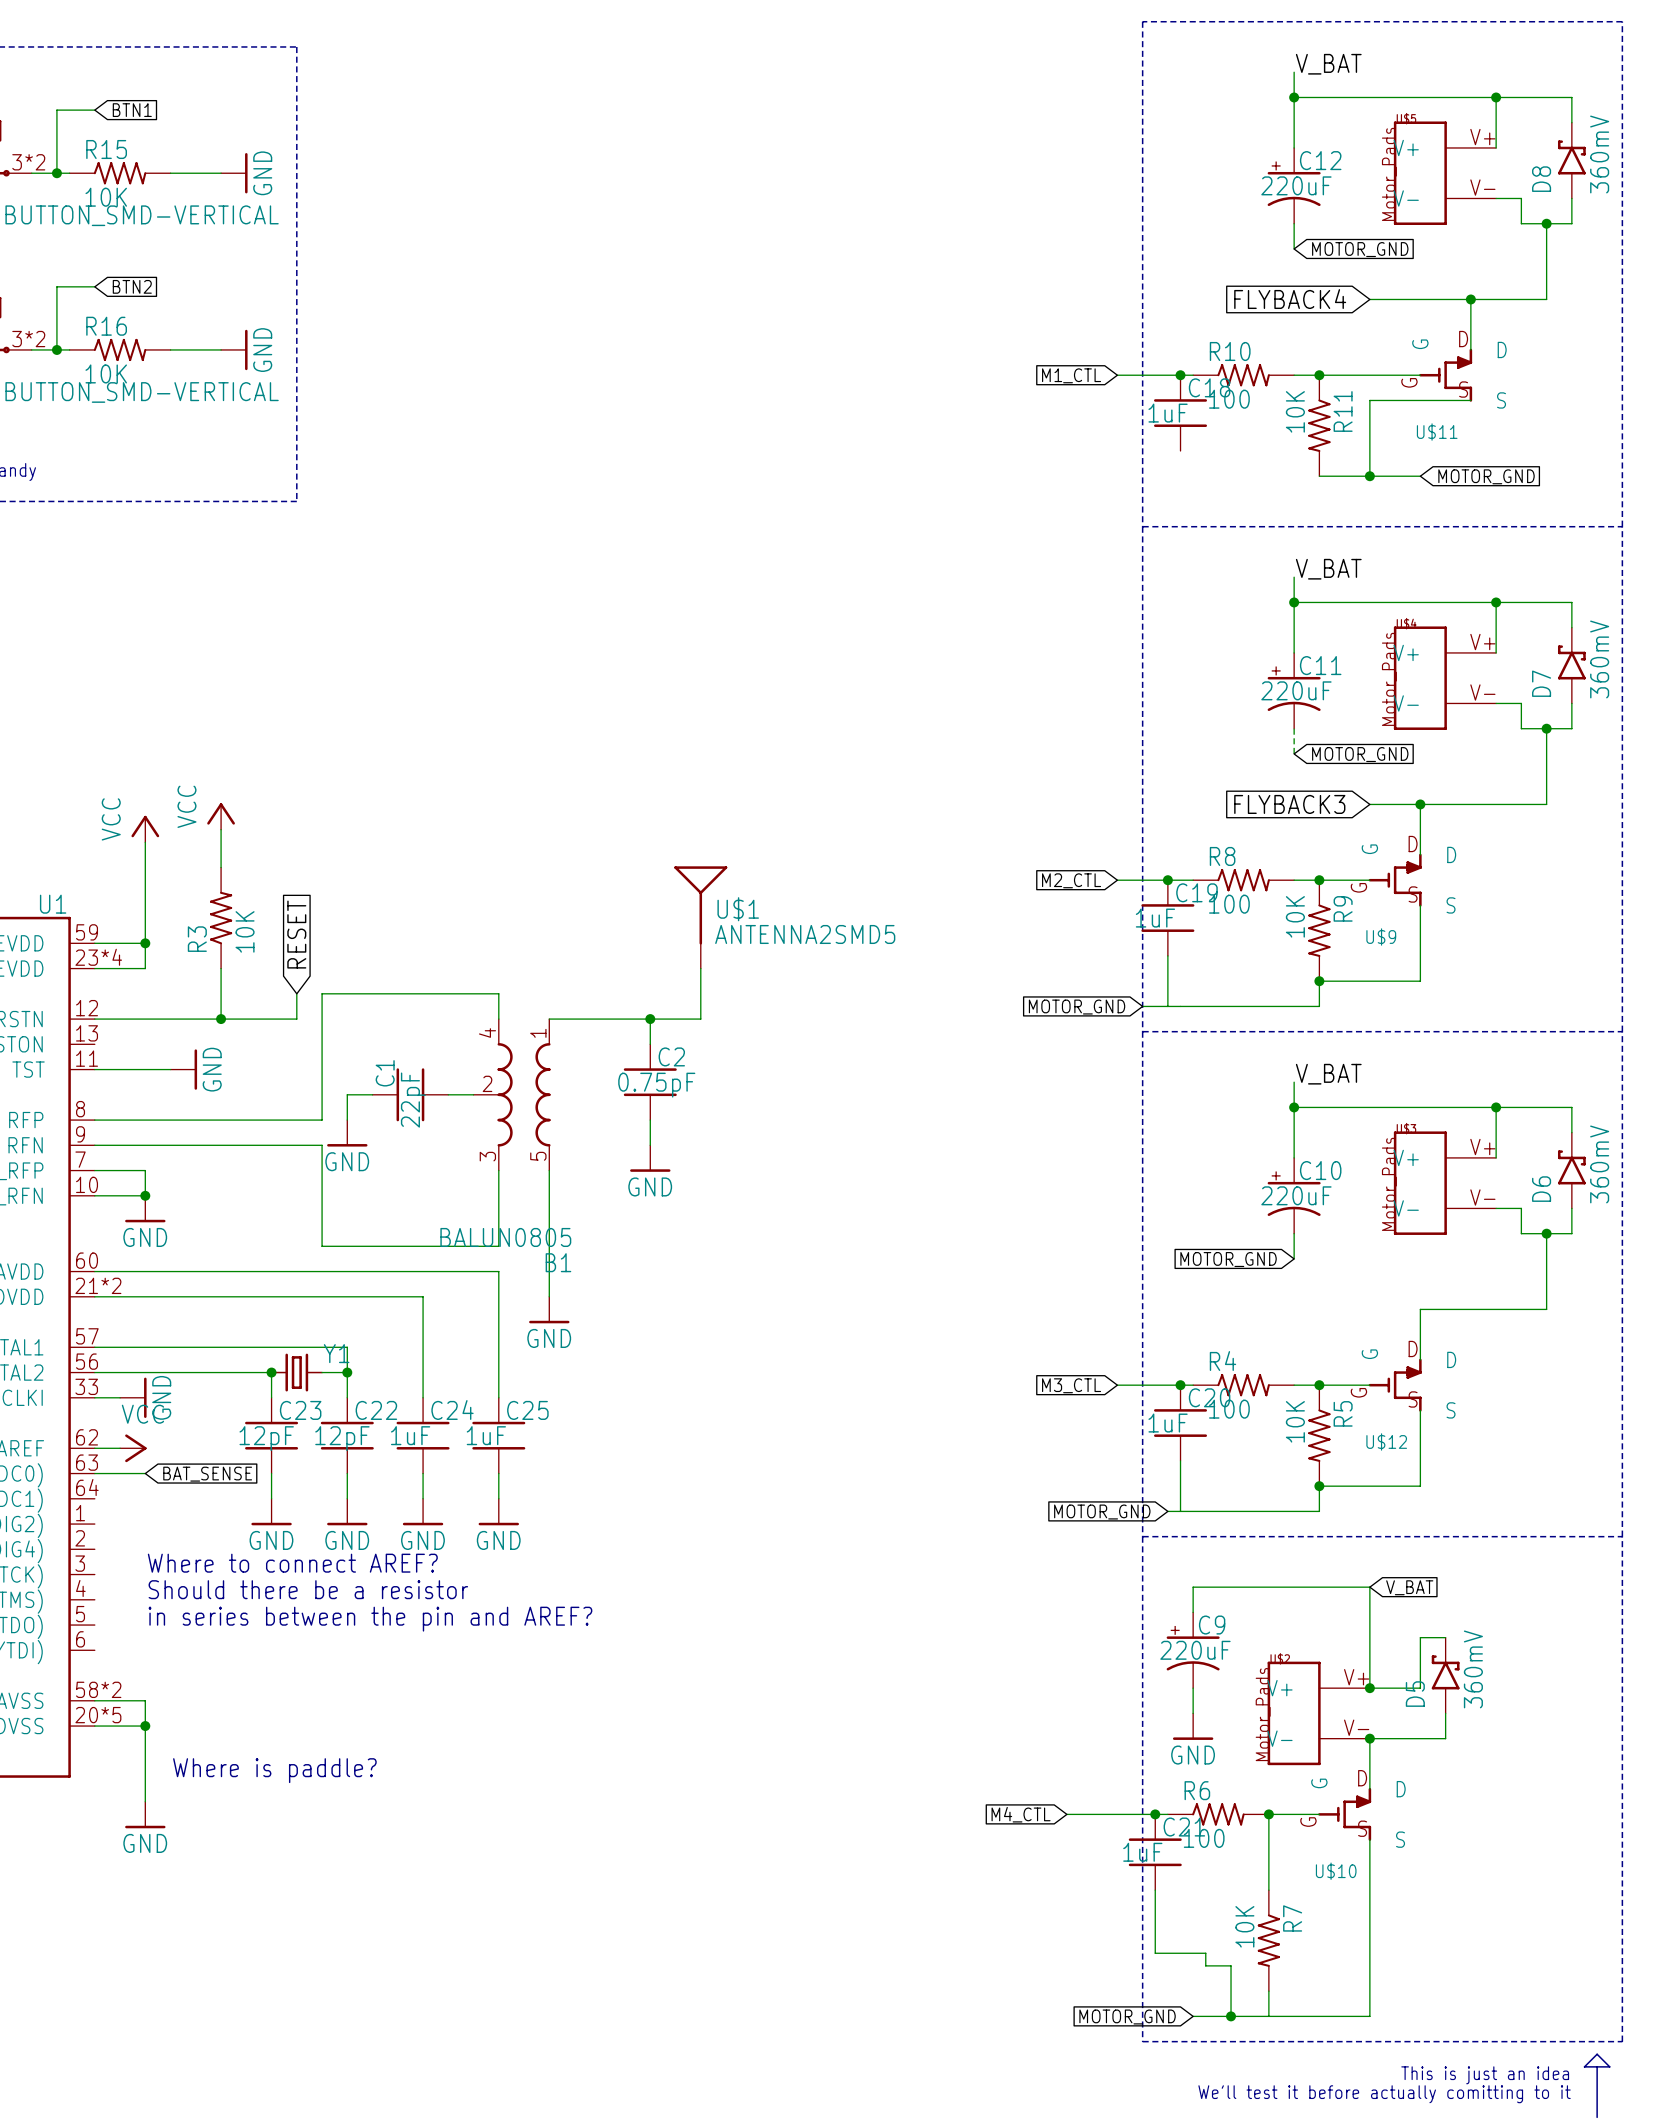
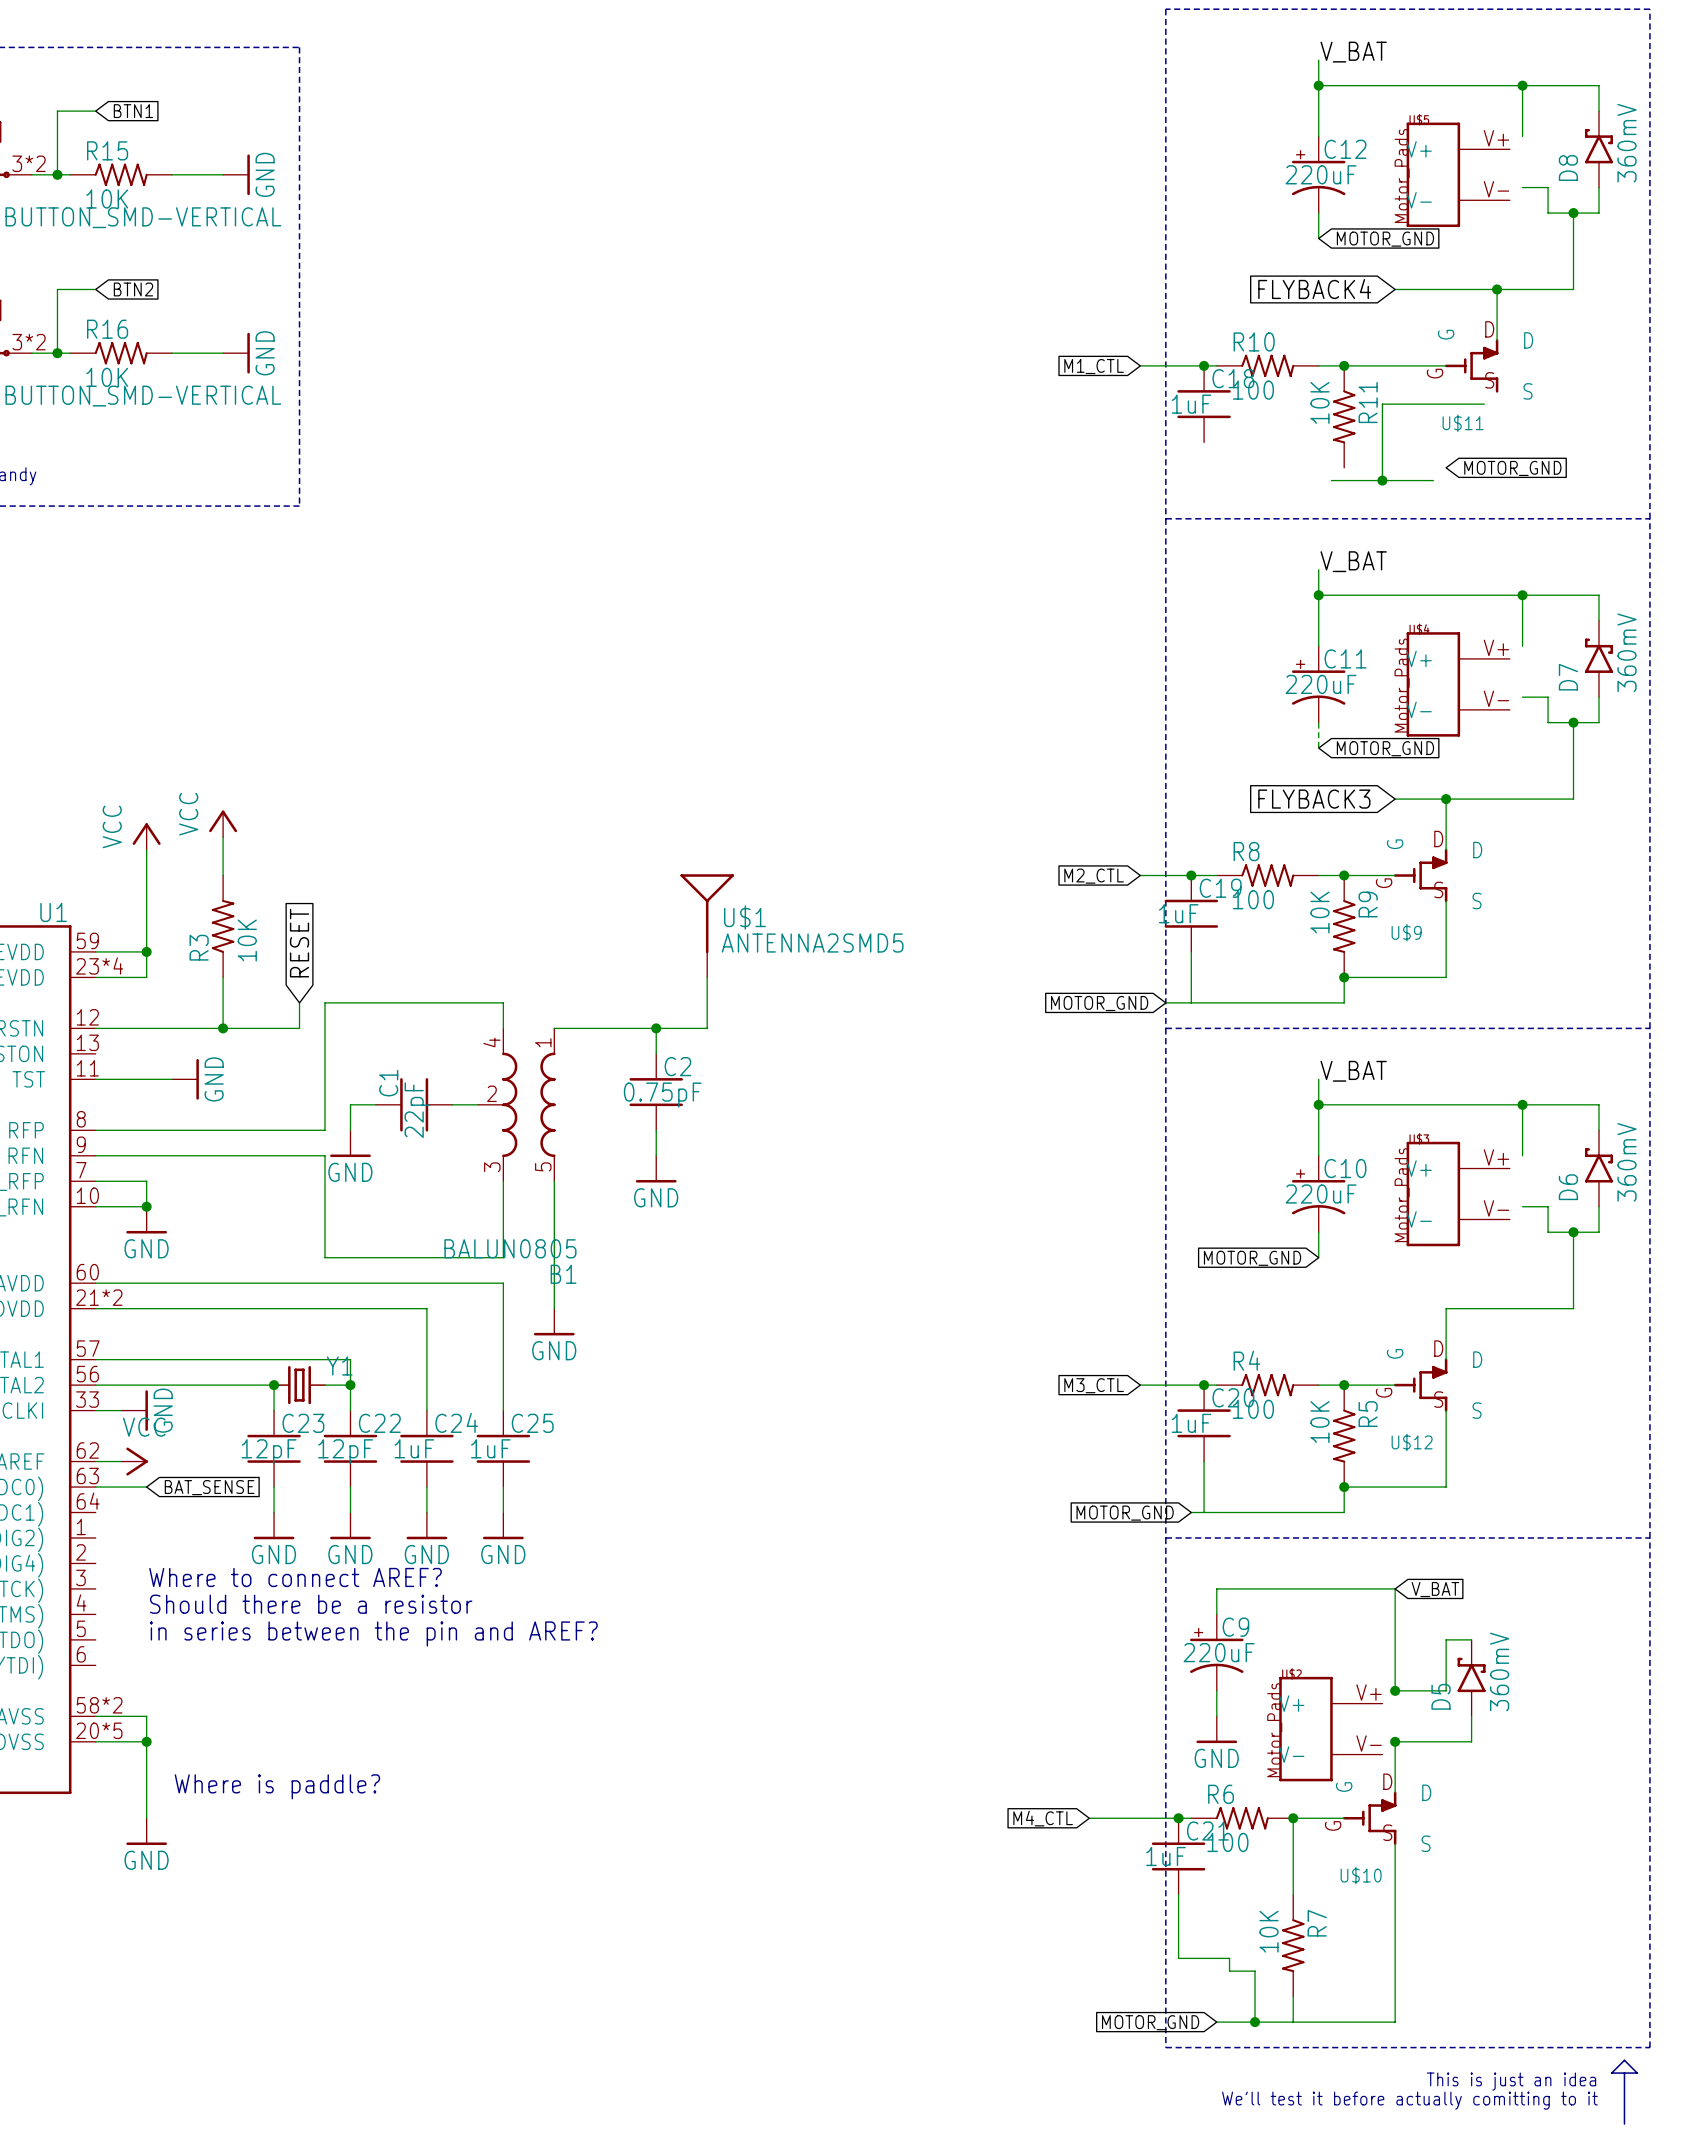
line: (1142, 21) (1142, 2041) (1622, 2041) (1622, 21) (1142, 21) -> (1165, 9) (1165, 2047) (1649, 2047) (1649, 9) (1165, 9)
label position: V_BAT (1328, 64) -> V_BAT (1353, 52)
wire: (1294, 72) (1294, 147) -> (1318, 60) (1318, 136)
wire: (1294, 97) (1571, 97) (1571, 122) -> (1318, 85) (1598, 85) (1598, 111)
junction position: (1294, 97) -> (1318, 85)
wire: (1496, 97) (1496, 147) -> (1522, 85) (1522, 136)
junction position: (1496, 97) -> (1522, 85)
D8 position: (1571, 160) -> (1598, 149)
C12 position: (1294, 185) -> (1318, 174)
wire: (1496, 198) (1521, 198) (1521, 223) (1571, 223) (1571, 198) -> (1522, 187) (1548, 187) (1548, 213) (1598, 213) (1598, 187)
wire: (1294, 223) (1294, 248) -> (1318, 213) (1318, 238)
wire: (1546, 223) (1546, 299) (1369, 299) -> (1573, 213) (1573, 289) (1395, 289)
junction position: (1546, 223) -> (1573, 213)
global label position: MOTOR_GND (1360, 249) -> MOTOR_GND (1385, 239)
global label position: FLYBACK4 (1290, 299) -> FLYBACK4 (1314, 289)
wire: (1470, 299) (1470, 349) -> (1497, 289) (1497, 340)
junction position: (1470, 299) -> (1497, 289)
global label position: M1_CTL (1071, 375) -> M1_CTL (1094, 366)
wire: (1117, 375) (1193, 375) -> (1140, 365) (1216, 365)
junction position: (1180, 375) -> (1204, 365)
R10 position: (1243, 375) -> (1267, 365)
wire: (1294, 375) (1420, 375) -> (1318, 365) (1446, 365)
junction position: (1319, 375) -> (1344, 365)
U$11 position: (1445, 375) -> (1471, 365)
C18 position: (1180, 413) -> (1204, 404)
R11 position: (1319, 425) -> (1344, 416)
global label position: MOTOR_GND (1486, 476) -> MOTOR_GND (1512, 468)
line: (1142, 526) (1622, 526) -> (1165, 518) (1649, 518)
label position: V_BAT (1328, 569) -> V_BAT (1353, 561)
wire: (1294, 577) (1294, 652) -> (1318, 569) (1318, 646)
wire: (1294, 602) (1571, 602) (1571, 627) -> (1318, 595) (1598, 595) (1598, 620)
junction position: (1294, 602) -> (1318, 595)
wire: (1496, 602) (1496, 652) -> (1522, 595) (1522, 646)
junction position: (1496, 602) -> (1522, 595)
D7 position: (1571, 665) -> (1598, 658)
C11 position: (1294, 690) -> (1318, 684)
wire: (1496, 703) (1521, 703) (1521, 728) (1571, 728) (1571, 703) -> (1522, 697) (1548, 697) (1548, 722) (1598, 722) (1598, 697)
wire: (1294, 728) (1294, 753) -> (1318, 722) (1318, 748)
wire: (1546, 728) (1546, 804) (1369, 804) -> (1573, 722) (1573, 799) (1395, 799)
junction position: (1546, 728) -> (1573, 722)
global label position: MOTOR_GND (1360, 754) -> MOTOR_GND (1385, 748)
global label position: FLYBACK3 (1289, 804) -> FLYBACK3 (1314, 799)
wire: (1420, 804) (1420, 854) -> (1446, 799) (1446, 850)
junction position: (1420, 804) -> (1446, 799)
global label position: M2_CTL (1071, 880) -> M2_CTL (1094, 876)
wire: (1117, 880) (1193, 880) -> (1140, 875) (1216, 875)
junction position: (1167, 880) -> (1191, 875)
R8 position: (1243, 880) -> (1267, 875)
wire: (1294, 880) (1369, 880) -> (1318, 875) (1395, 875)
junction position: (1319, 880) -> (1344, 875)
U$9 position: (1395, 880) -> (1420, 875)
wire: (1420, 905) (1420, 981) (1319, 981) (1319, 1006) (1142, 1006) -> (1446, 900) (1446, 977) (1344, 977) (1344, 1002) (1165, 1002)
C19 position: (1167, 918) -> (1191, 913)
R9 position: (1319, 930) -> (1344, 926)
wire: (1167, 955) (1167, 1006) -> (1191, 951) (1191, 1002)
junction position: (1319, 981) -> (1344, 977)
global label position: MOTOR_GND (1077, 1007) -> MOTOR_GND (1099, 1003)
line: (1142, 1031) (1622, 1031) -> (1165, 1028) (1649, 1028)
label position: V_BAT (1328, 1074) -> V_BAT (1353, 1071)
wire: (1294, 1082) (1294, 1157) -> (1318, 1079) (1318, 1155)
wire: (1294, 1107) (1571, 1107) (1571, 1132) -> (1318, 1104) (1598, 1104) (1598, 1130)
junction position: (1294, 1107) -> (1318, 1104)
wire: (1496, 1107) (1496, 1157) -> (1522, 1104) (1522, 1155)
junction position: (1496, 1107) -> (1522, 1104)
D6 position: (1571, 1170) -> (1598, 1168)
C10 position: (1294, 1195) -> (1318, 1194)
wire: (1496, 1208) (1521, 1208) (1521, 1233) (1571, 1233) (1571, 1208) -> (1522, 1206) (1548, 1206) (1548, 1232) (1598, 1232) (1598, 1206)
wire: (1294, 1233) (1294, 1258) -> (1318, 1232) (1318, 1257)
wire: (1546, 1233) (1546, 1309) (1420, 1309) (1420, 1359) -> (1573, 1232) (1573, 1308) (1446, 1308) (1446, 1359)
junction position: (1546, 1233) -> (1573, 1232)
global label position: MOTOR_GND (1228, 1259) -> MOTOR_GND (1252, 1258)
global label position: M3_CTL (1071, 1385) -> M3_CTL (1094, 1385)
wire: (1117, 1385) (1193, 1385) -> (1140, 1385) (1216, 1385)
junction position: (1180, 1385) -> (1204, 1385)
R4 position: (1243, 1385) -> (1267, 1385)
wire: (1294, 1385) (1369, 1385) -> (1318, 1385) (1395, 1385)
junction position: (1319, 1385) -> (1344, 1385)
U$12 position: (1395, 1385) -> (1420, 1385)
wire: (1420, 1410) (1420, 1486) (1319, 1486) (1319, 1511) (1167, 1511) -> (1446, 1410) (1446, 1487) (1344, 1487) (1344, 1512) (1191, 1512)
C20 position: (1180, 1423) -> (1204, 1423)
R5 position: (1319, 1435) -> (1344, 1436)
wire: (1180, 1460) (1180, 1511) -> (1204, 1461) (1204, 1512)
junction position: (1319, 1486) -> (1344, 1487)
global label position: MOTOR_GND (1102, 1512) -> MOTOR_GND (1125, 1513)
line: (1142, 1536) (1622, 1536) -> (1165, 1537) (1649, 1537)
global label position: V_BAT (1409, 1587) -> V_BAT (1435, 1589)
wire: (1193, 1612) (1193, 1587) (1369, 1587) (1369, 1688) (1420, 1688) (1420, 1637) (1445, 1637) -> (1216, 1614) (1216, 1588) (1395, 1588) (1395, 1690) (1446, 1690) (1446, 1639) (1471, 1639)
C9 position: (1193, 1650) -> (1216, 1652)
D5 position: (1445, 1675) -> (1471, 1678)
wire: (1193, 1688) (1193, 1713) -> (1216, 1690) (1216, 1716)
junction position: (1369, 1688) -> (1395, 1690)
wire: (1445, 1713) (1445, 1738) (1369, 1738) (1369, 1789) -> (1471, 1716) (1471, 1741) (1395, 1741) (1395, 1792)
power symbol position: GND (1193, 1726) -> GND (1216, 1729)
junction position: (1369, 1738) -> (1395, 1741)
global label position: M4_CTL (1021, 1814) -> M4_CTL (1043, 1818)
wire: (1066, 1814) (1167, 1814) -> (1089, 1818) (1191, 1818)
junction position: (1155, 1814) -> (1178, 1818)
R6 position: (1218, 1814) -> (1242, 1818)
junction position: (1268, 1814) -> (1293, 1818)
wire: (1319, 1814) (1268, 1814) (1268, 1890) -> (1344, 1818) (1293, 1818) (1293, 1894)
U$10 position: (1344, 1814) -> (1369, 1818)
wire: (1369, 1839) (1369, 2016) (1193, 2016) -> (1395, 1843) (1395, 2022) (1216, 2022)
C21 position: (1155, 1852) -> (1178, 1856)
wire: (1155, 1890) (1155, 1953) (1205, 1953) (1205, 1965) (1231, 1965) (1231, 2016) -> (1178, 1894) (1178, 1958) (1229, 1958) (1229, 1971) (1255, 1971) (1255, 2022)
R7 position: (1268, 1940) -> (1293, 1945)
wire: (1268, 1991) (1268, 2016) -> (1293, 1996) (1293, 2022)
global label position: MOTOR_GND (1127, 2016) -> MOTOR_GND (1150, 2022)
junction position: (1231, 2016) -> (1255, 2022)
line: (1597, 2054) (1584, 2066) (1609, 2066) (1597, 2054) -> (1624, 2060) (1611, 2073) (1637, 2073) (1624, 2060)
line: (1597, 2066) (1597, 2117) -> (1624, 2073) (1624, 2124)
text position: This is just an idea (1485, 2075) -> This is just an idea (1511, 2081)
text position: We'll test it before actually comitting to it (1384, 2094) -> We'll test it before actually comitting to it (1409, 2100)

